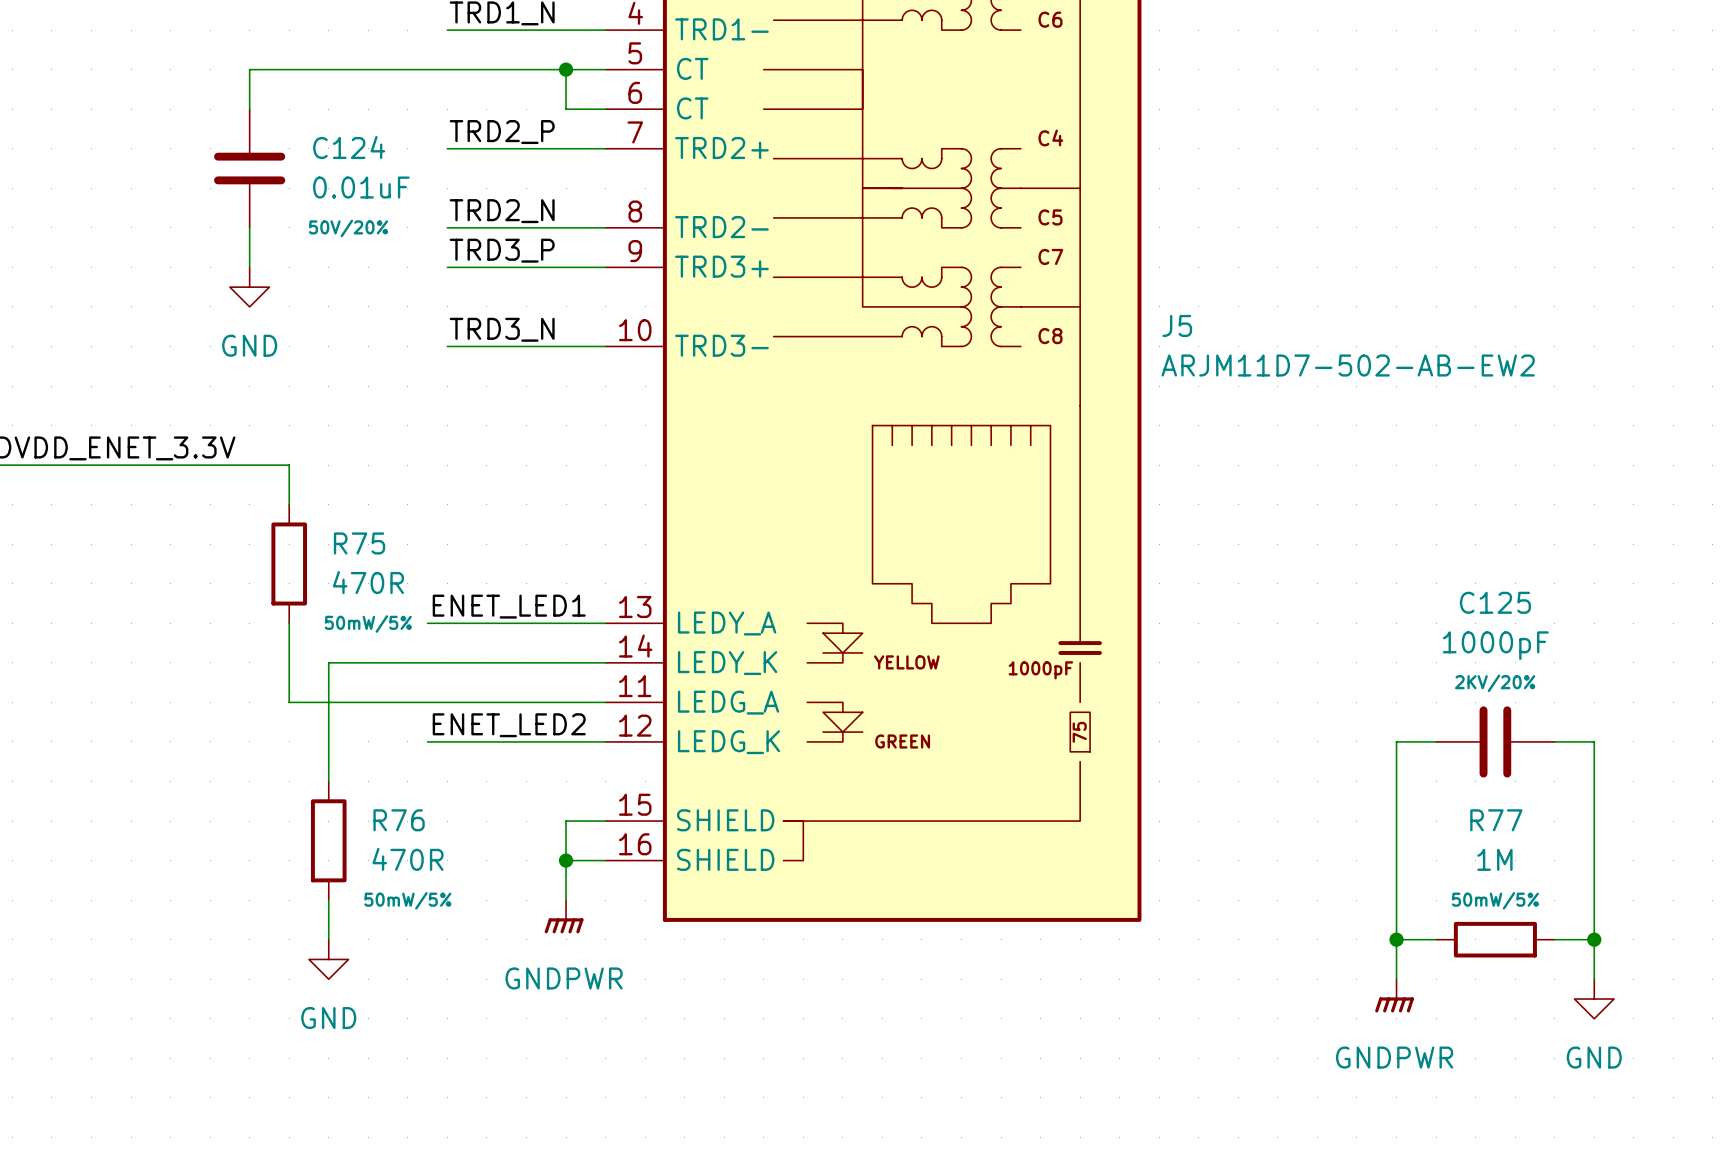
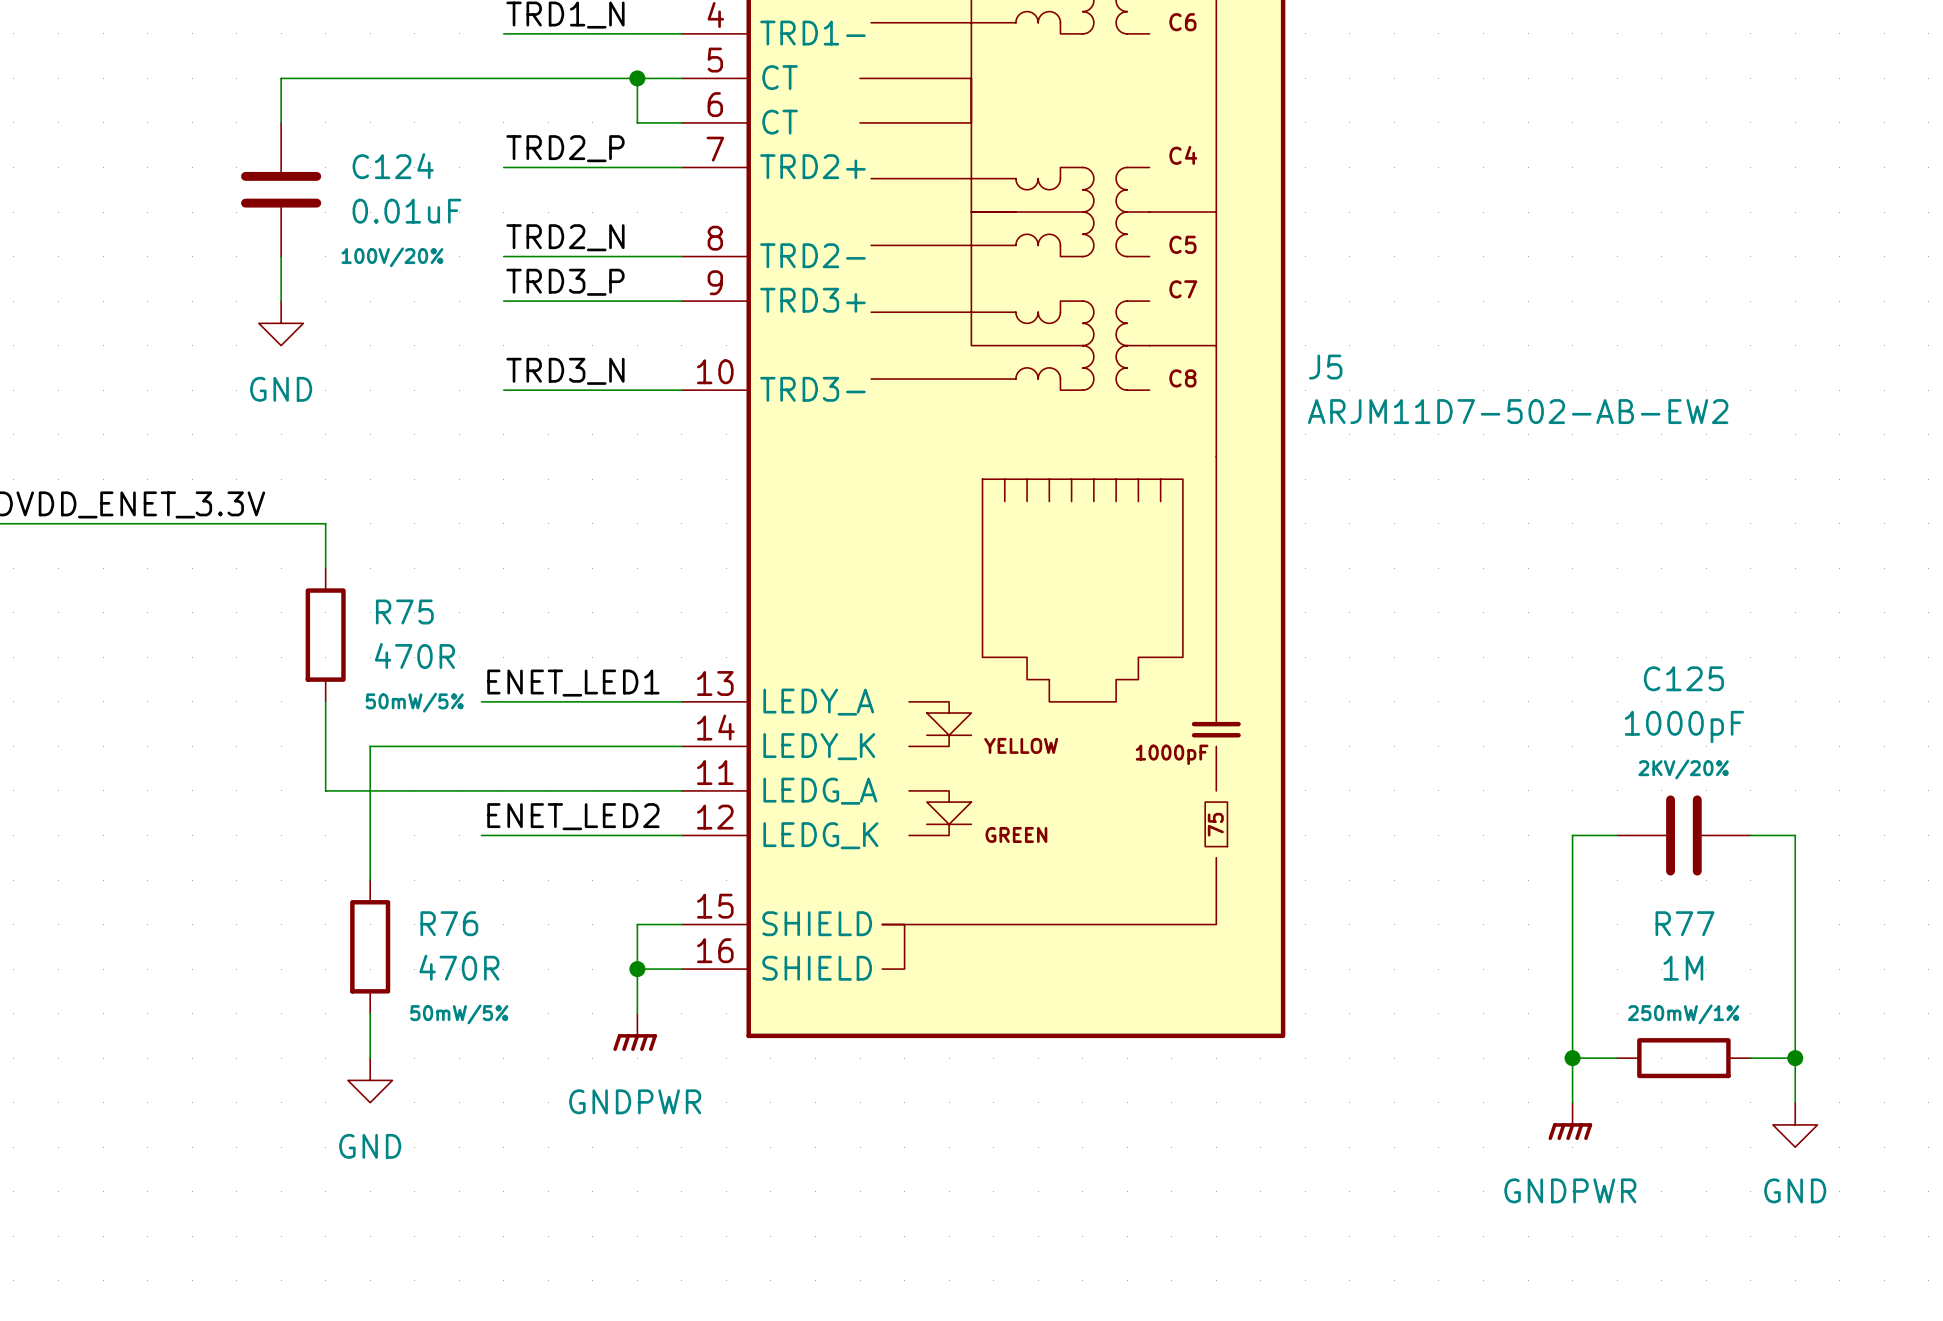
C124 text: 50V/20% (348, 228) -> 100V/20% (392, 257)
R77 text: 50mW/5% (1495, 900) -> 250mW/1% (1683, 1014)

